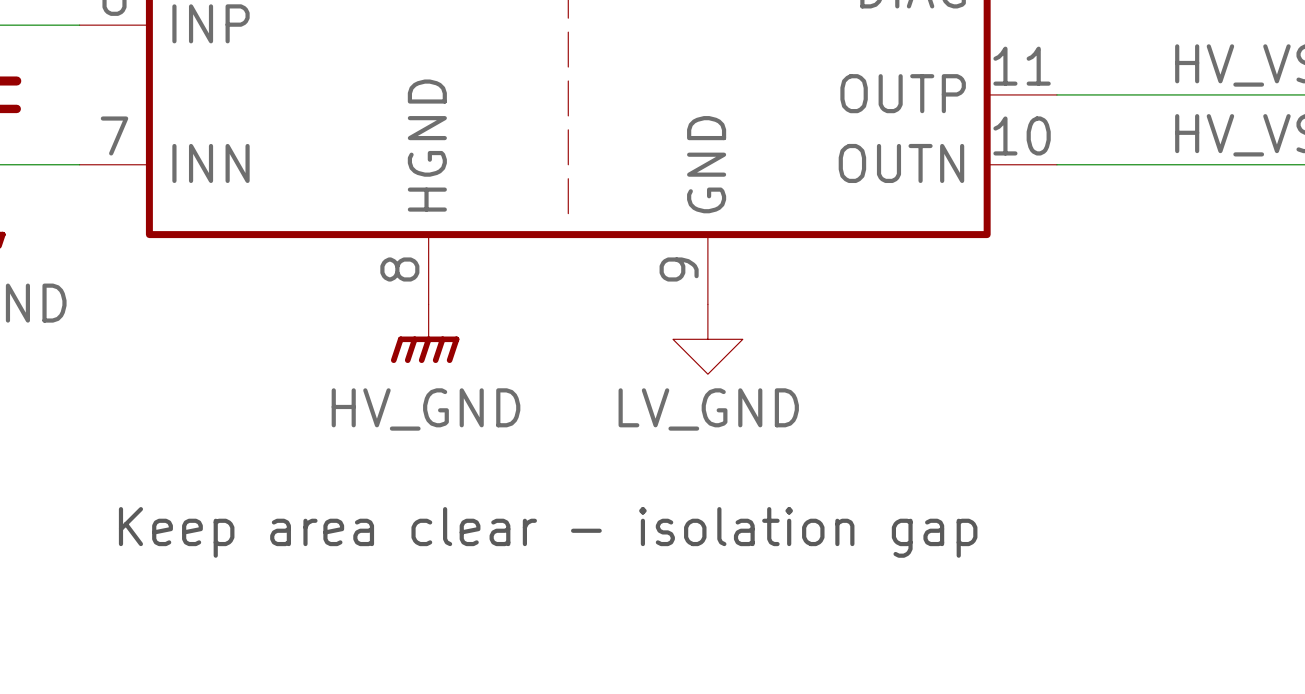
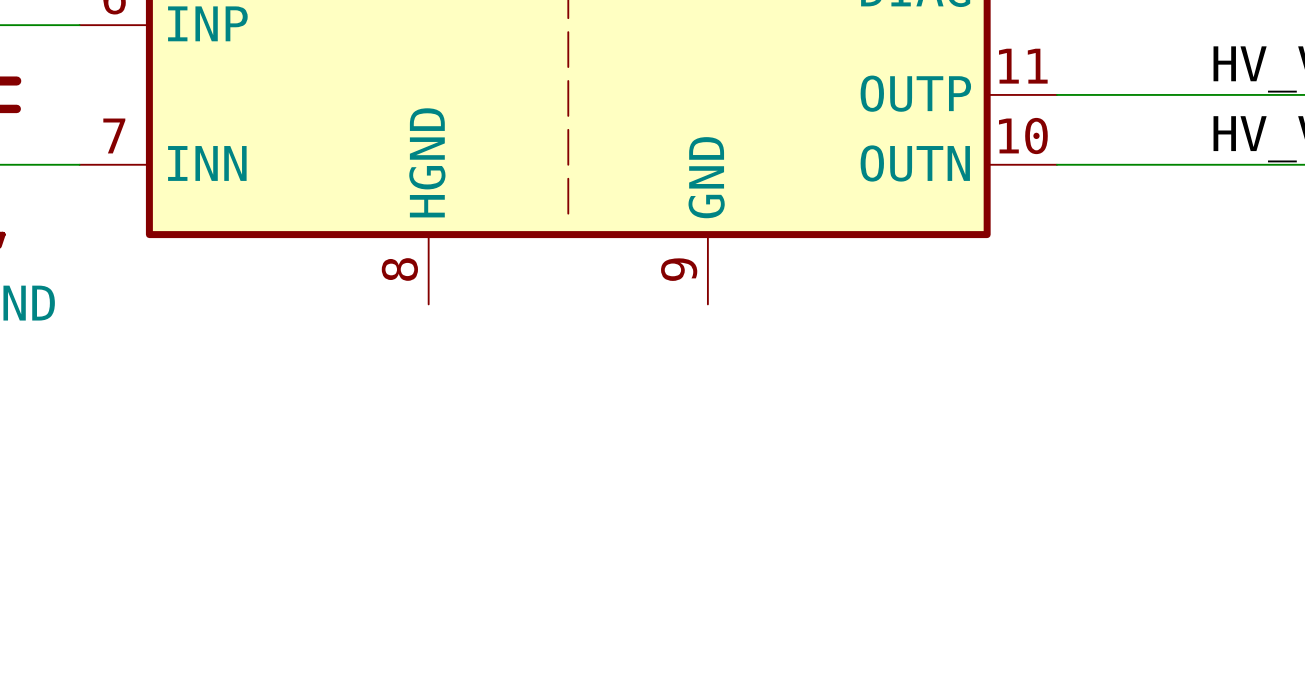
power symbol: HV_GND (425, 333) -> none
power symbol: LV_GND (707, 339) -> none
text: Keep area clear - isolation gap (548, 532) -> none

